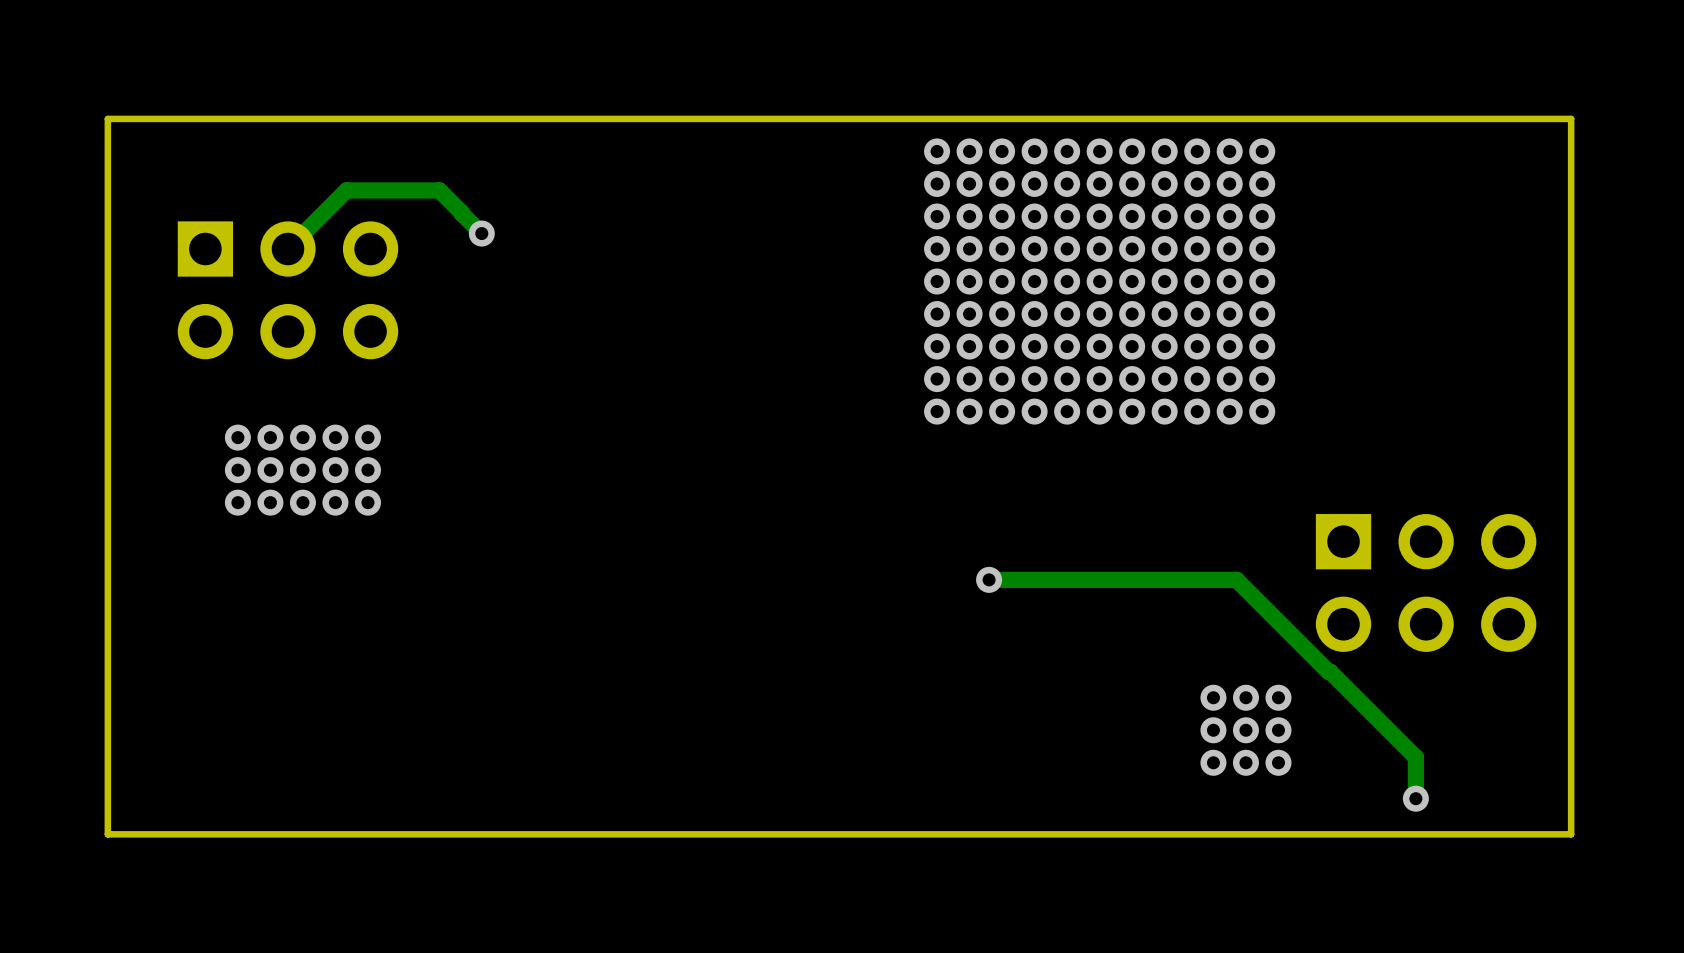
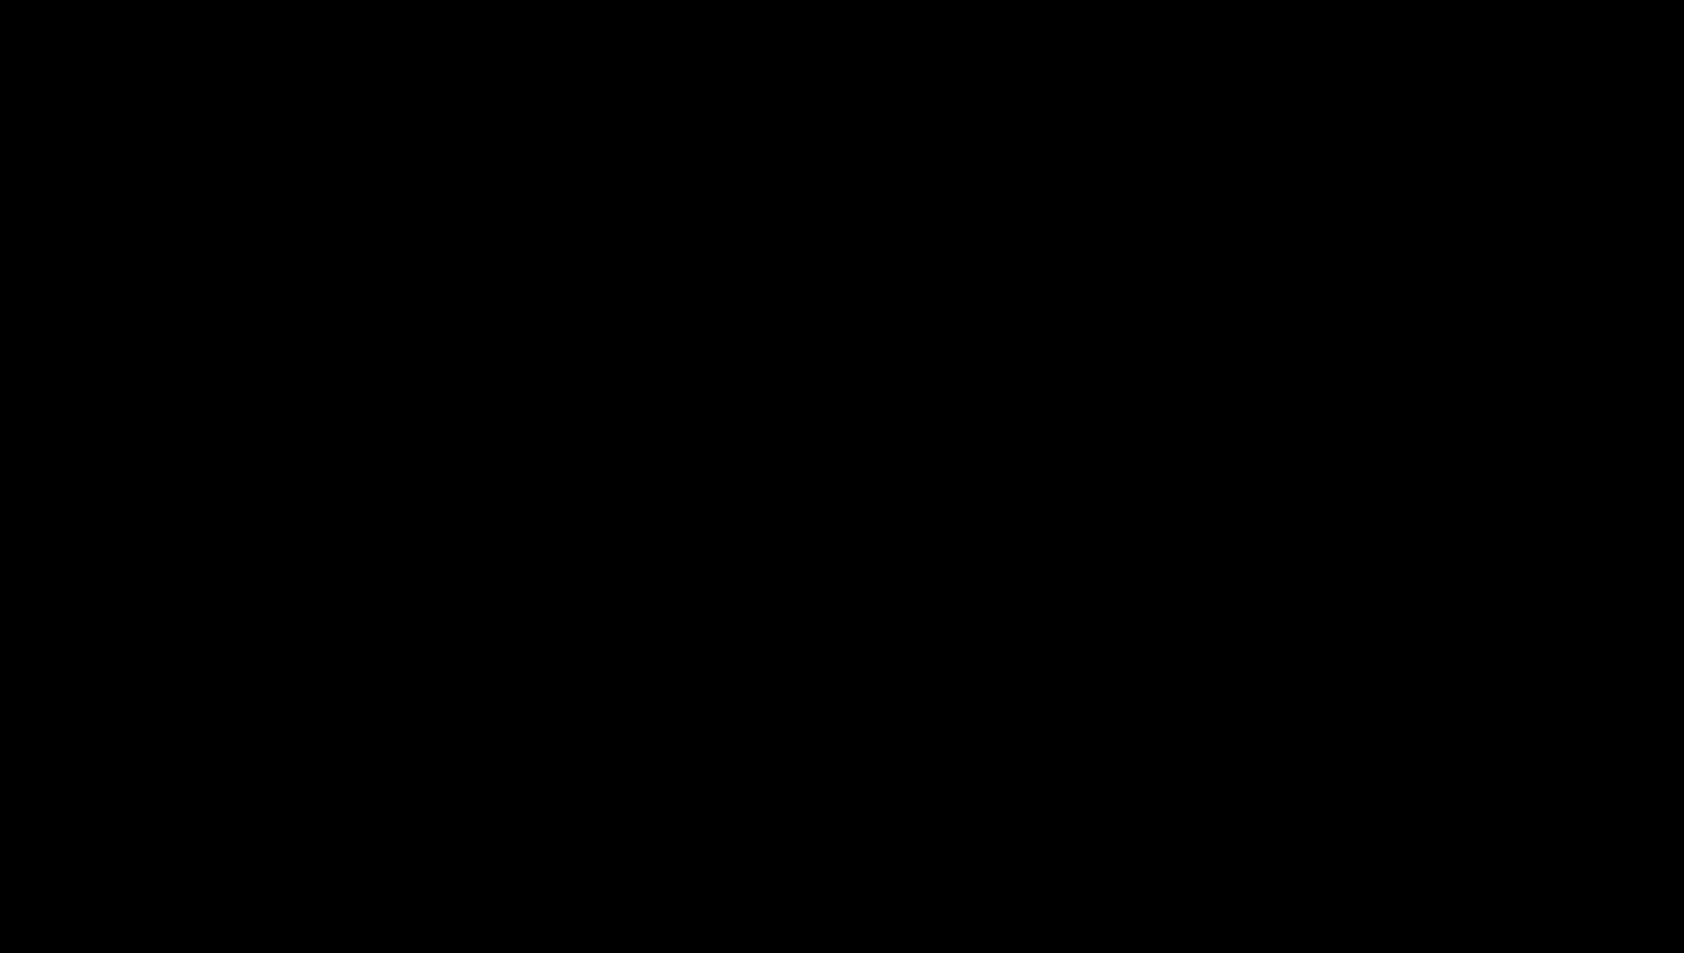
board edge: (1571, 118) (1571, 834) (107, 834) (107, 118) (1571, 118) -> none
via: (937, 151) -> none
via: (969, 151) -> none
via: (1002, 151) -> none
via: (1034, 151) -> none
via: (1067, 151) -> none
via: (1099, 151) -> none
via: (1132, 151) -> none
via: (1164, 151) -> none
via: (1197, 151) -> none
via: (1229, 151) -> none
via: (1262, 151) -> none
via: (937, 183) -> none
via: (969, 183) -> none
via: (1002, 183) -> none
via: (1034, 183) -> none
via: (1067, 183) -> none
via: (1099, 183) -> none
via: (1132, 183) -> none
via: (1164, 183) -> none
via: (1197, 183) -> none
via: (1229, 183) -> none
via: (1262, 183) -> none
via: (937, 216) -> none
via: (969, 216) -> none
via: (1002, 216) -> none
via: (1034, 216) -> none
via: (1067, 216) -> none
via: (1099, 216) -> none
via: (1132, 216) -> none
via: (1164, 216) -> none
via: (1197, 216) -> none
via: (1229, 216) -> none
via: (1262, 216) -> none
track: (481, 233) (439, 190) (346, 190) (287, 249) -> none
via: (481, 233) -> none
via: (937, 249) -> none
via: (969, 249) -> none
via: (1002, 249) -> none
via: (1034, 249) -> none
via: (1067, 249) -> none
via: (1099, 249) -> none
via: (1132, 249) -> none
via: (1164, 249) -> none
via: (1197, 249) -> none
via: (1229, 249) -> none
via: (1262, 249) -> none
via: (937, 281) -> none
via: (969, 281) -> none
via: (1002, 281) -> none
via: (1034, 281) -> none
via: (1067, 281) -> none
via: (1099, 281) -> none
via: (1132, 281) -> none
via: (1164, 281) -> none
via: (1197, 281) -> none
via: (1229, 281) -> none
via: (1262, 281) -> none
part: (287, 290) -> none
via: (937, 314) -> none
via: (969, 314) -> none
via: (1002, 314) -> none
via: (1034, 314) -> none
via: (1067, 314) -> none
via: (1099, 314) -> none
via: (1132, 314) -> none
via: (1164, 314) -> none
via: (1197, 314) -> none
via: (1229, 314) -> none
via: (1262, 314) -> none
via: (937, 346) -> none
via: (969, 346) -> none
via: (1002, 346) -> none
via: (1034, 346) -> none
via: (1067, 346) -> none
via: (1099, 346) -> none
via: (1132, 346) -> none
via: (1164, 346) -> none
via: (1197, 346) -> none
via: (1229, 346) -> none
via: (1262, 346) -> none
via: (937, 379) -> none
via: (969, 379) -> none
via: (1002, 379) -> none
via: (1034, 379) -> none
via: (1067, 379) -> none
via: (1099, 379) -> none
via: (1132, 379) -> none
via: (1164, 379) -> none
via: (1197, 379) -> none
via: (1229, 379) -> none
via: (1262, 379) -> none
via: (937, 411) -> none
via: (969, 411) -> none
via: (1002, 411) -> none
via: (1034, 411) -> none
via: (1067, 411) -> none
via: (1099, 411) -> none
via: (1132, 411) -> none
via: (1164, 411) -> none
via: (1197, 411) -> none
via: (1229, 411) -> none
via: (1262, 411) -> none
via: (237, 437) -> none
via: (270, 437) -> none
via: (302, 437) -> none
via: (335, 437) -> none
via: (367, 437) -> none
via: (237, 470) -> none
via: (270, 470) -> none
via: (302, 470) -> none
via: (335, 470) -> none
via: (367, 470) -> none
via: (237, 502) -> none
via: (270, 502) -> none
via: (302, 502) -> none
via: (335, 502) -> none
via: (367, 502) -> none
track: (989, 579) (1236, 579) (1415, 757) (1415, 798) -> none
via: (989, 579) -> none
part: (1426, 582) -> none
via: (1213, 697) -> none
via: (1245, 697) -> none
via: (1278, 697) -> none
via: (1213, 730) -> none
via: (1245, 730) -> none
via: (1278, 730) -> none
via: (1213, 762) -> none
via: (1245, 762) -> none
via: (1278, 762) -> none
via: (1415, 798) -> none

